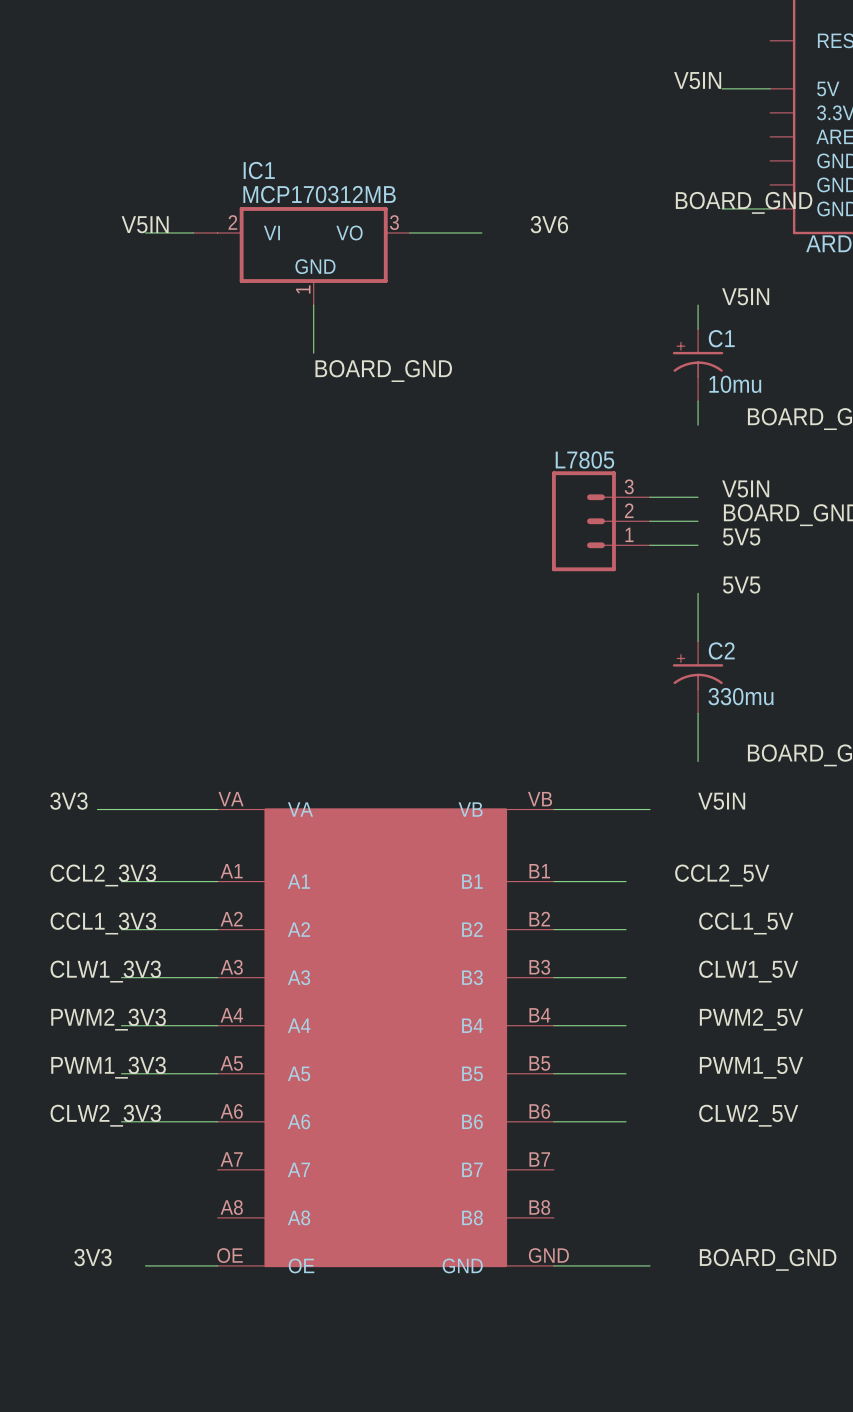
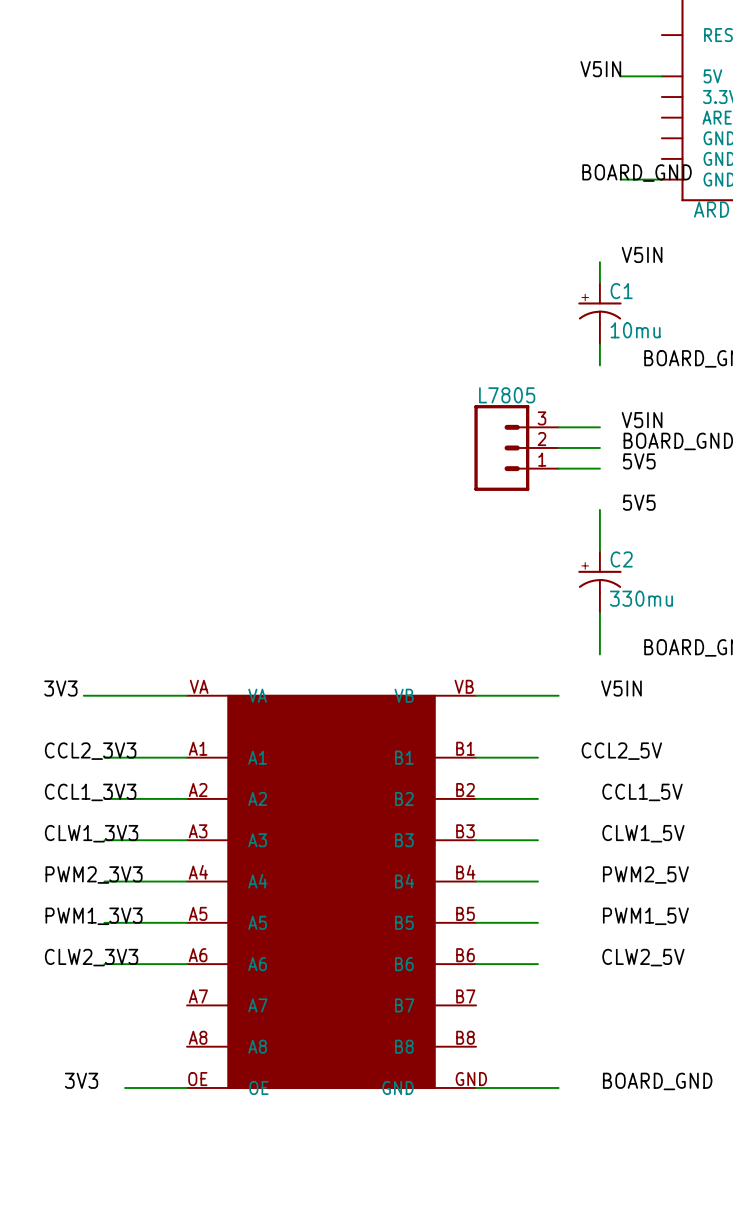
label: V5IN (145, 224) -> none
label: 3V6 (549, 224) -> none
wire: (145, 232) (193, 232) -> none
wire: (409, 232) (481, 232) -> none
IC1: MCP170312MB (301, 256) -> none
wire: (313, 305) (313, 353) -> none
label: BOARD_GND (383, 371) -> none

